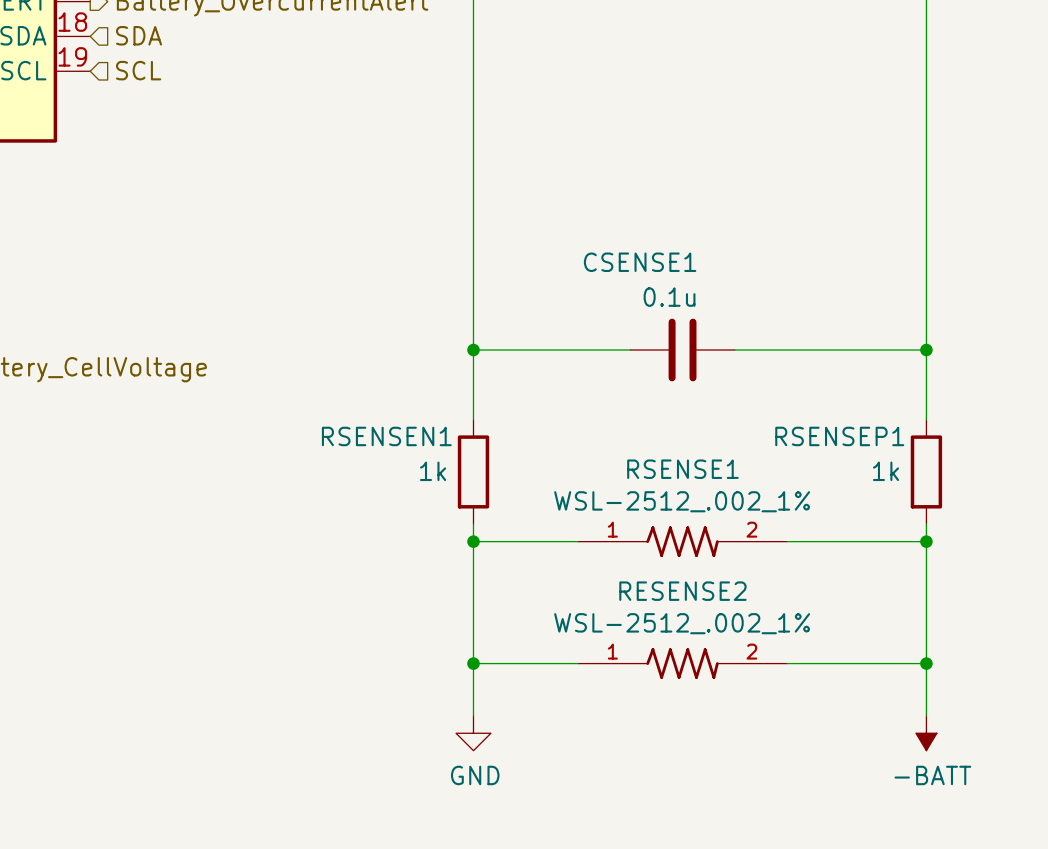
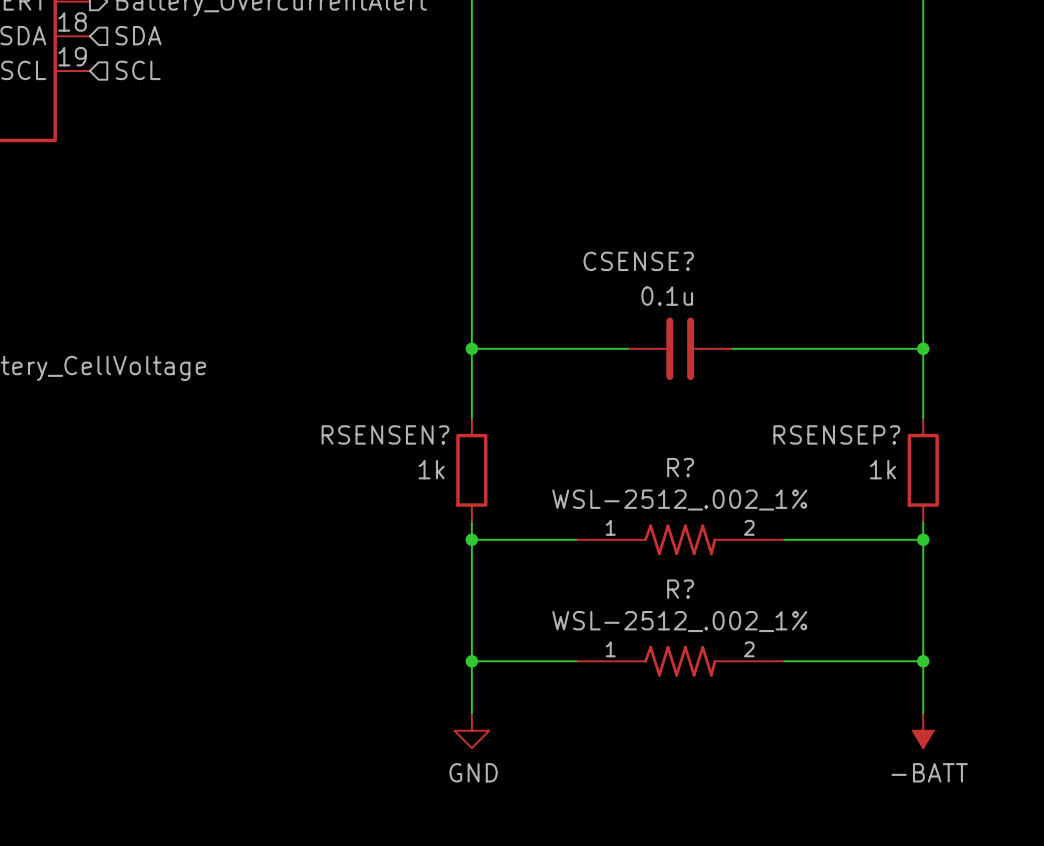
CSENSE1 name: CSENSE1 (640, 262) -> CSENSE? (638, 261)
RSENSEN1 name: RSENSEN1 (386, 436) -> RSENSEN? (385, 434)
RSENSEP1 name: RSENSEP1 (839, 436) -> RSENSEP? (836, 434)
RSENSE1 name: RSENSE1 (682, 469) -> R? (680, 467)
RESENSE2 name: RESENSE2 (682, 591) -> R? (680, 589)

